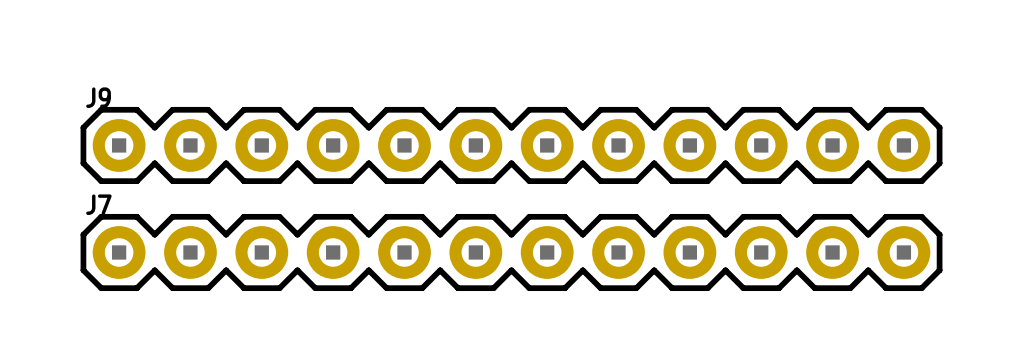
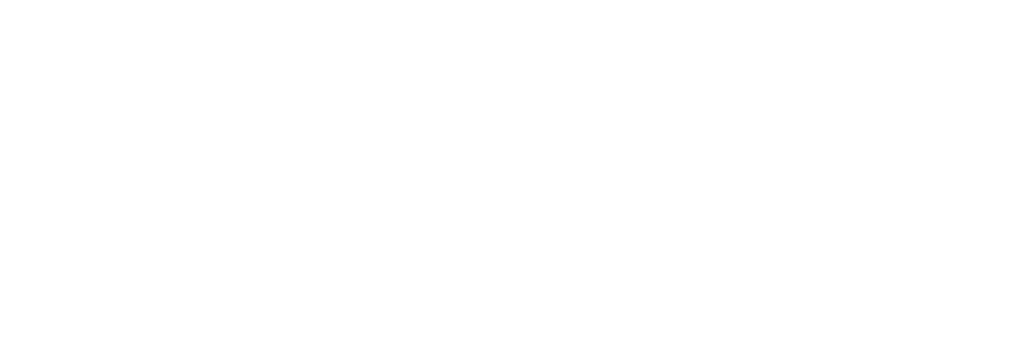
J9: (511, 145) -> none
J7: (511, 252) -> none

